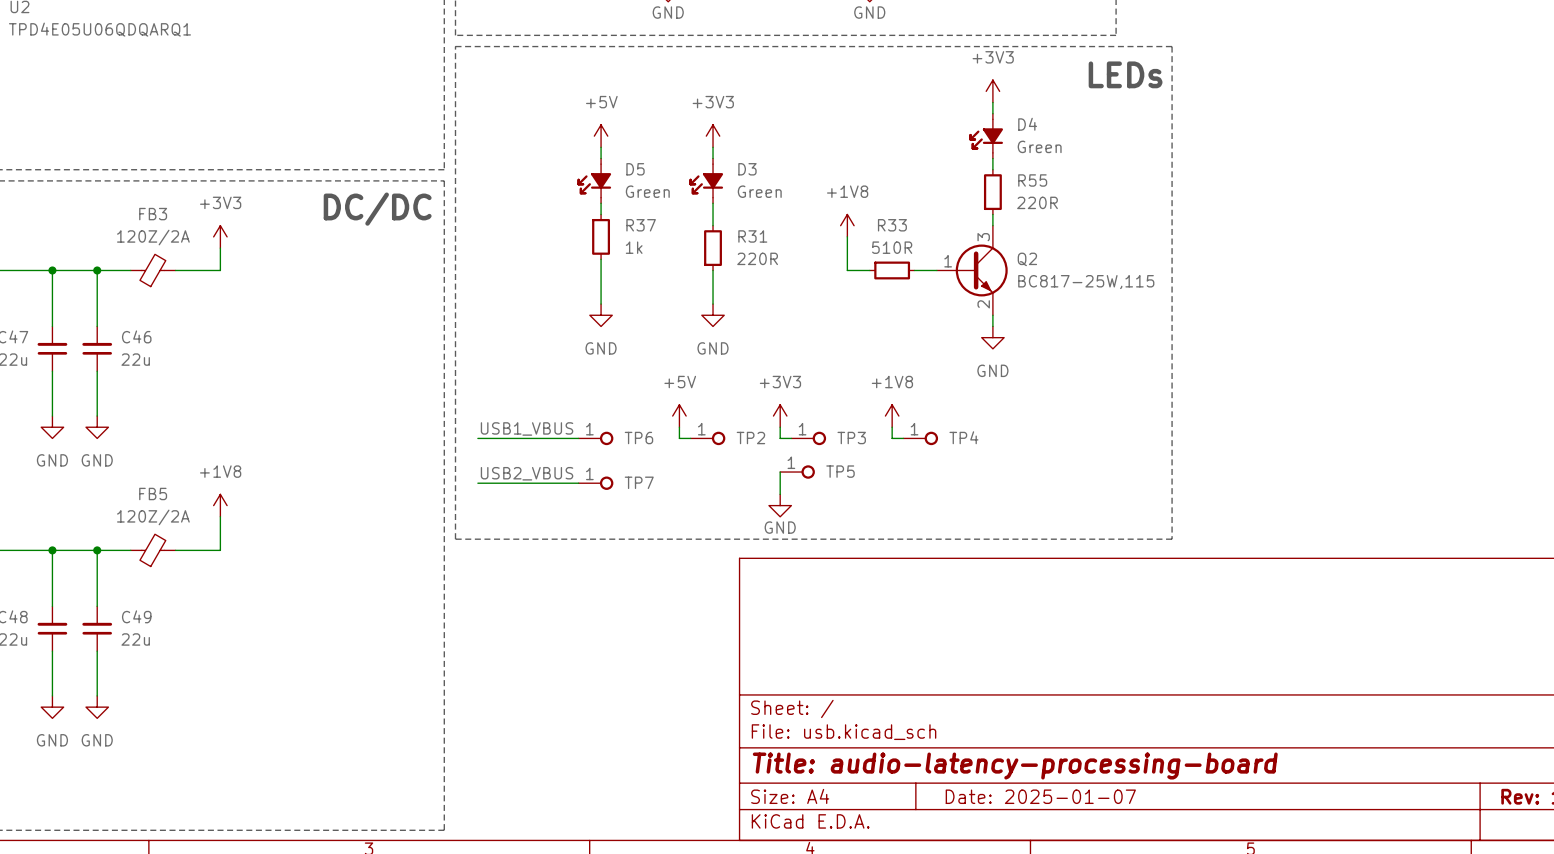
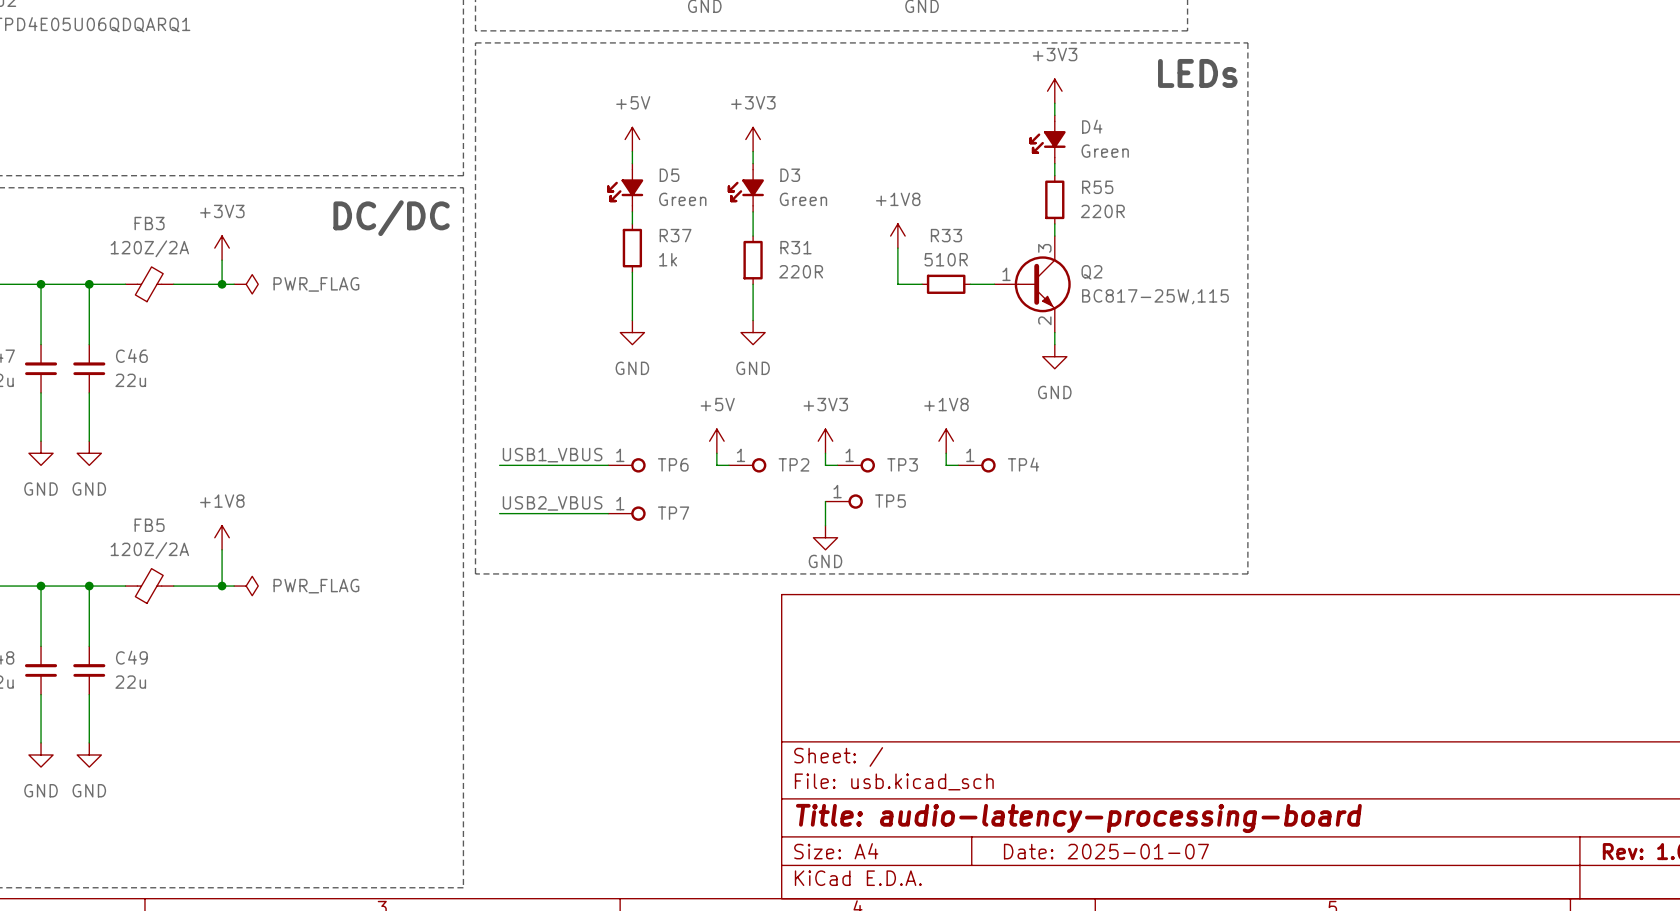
wire: none -> (222, 284) (234, 284)
junction: none -> (222, 284)
power symbol: none -> PWR_FLAG (246, 284)
wire: none -> (222, 586) (234, 586)
junction: none -> (222, 586)
power symbol: none -> PWR_FLAG (246, 586)

